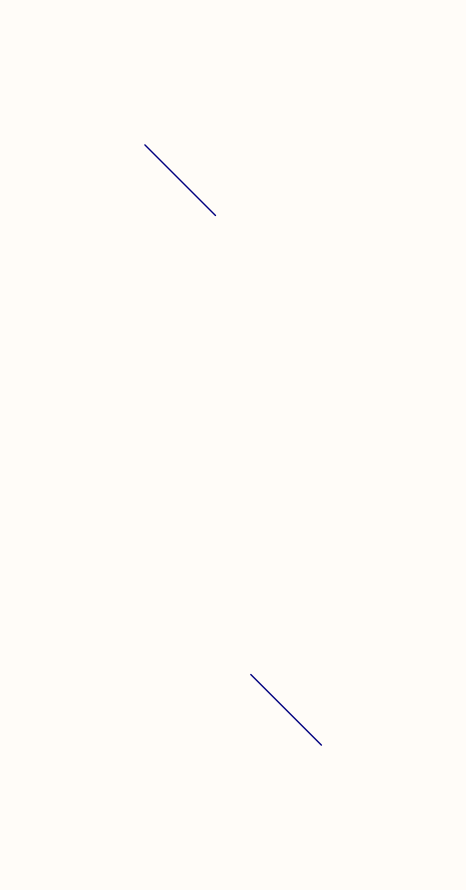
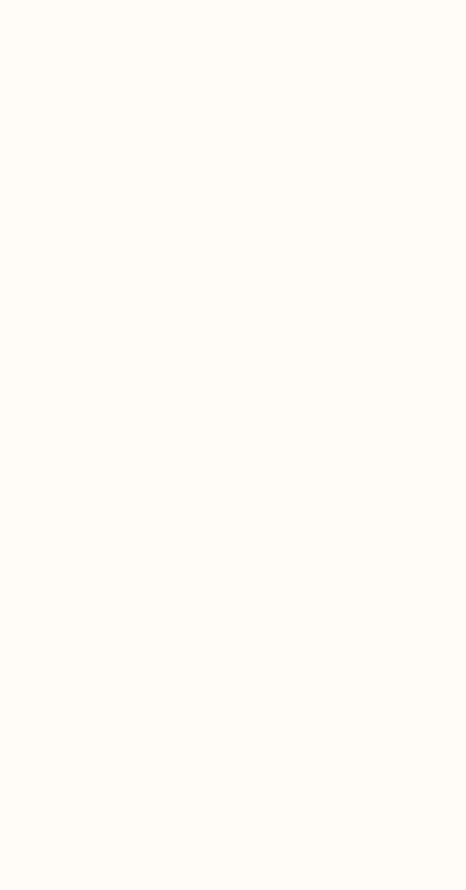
wire: (144, 144) (215, 215) -> none
wire: (250, 674) (321, 745) -> none

